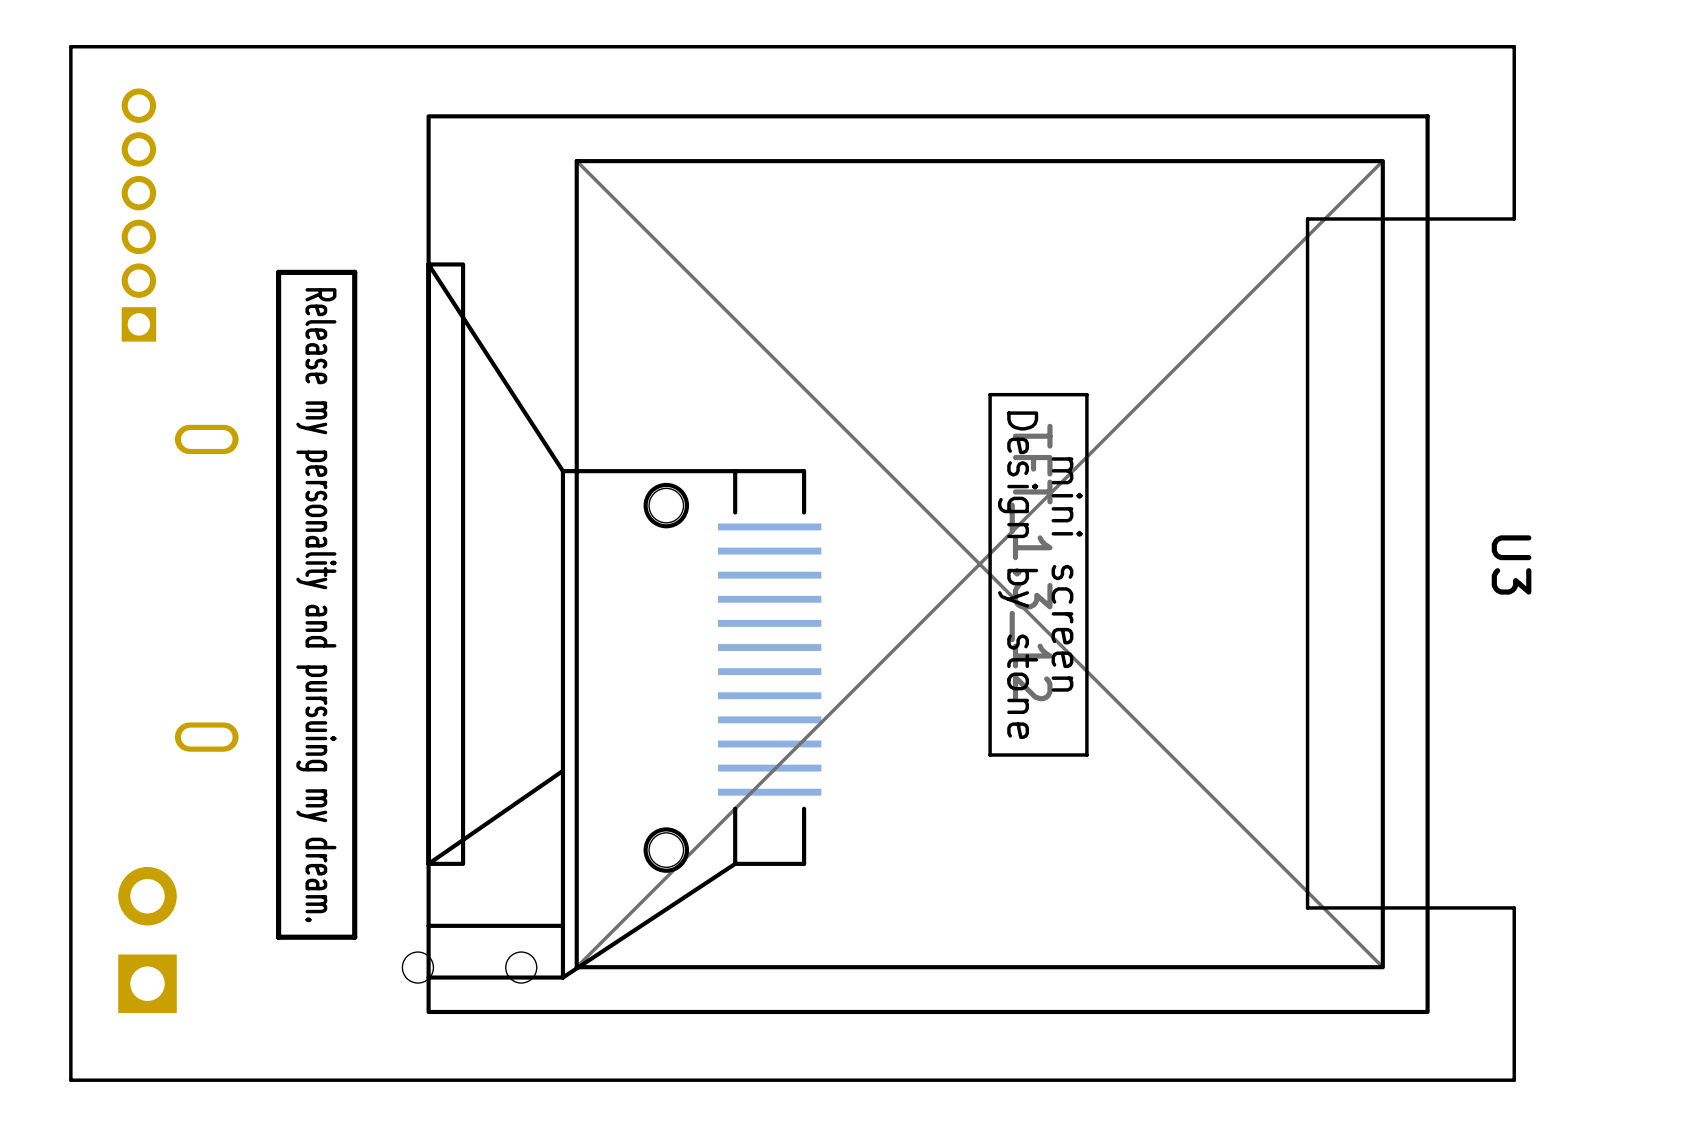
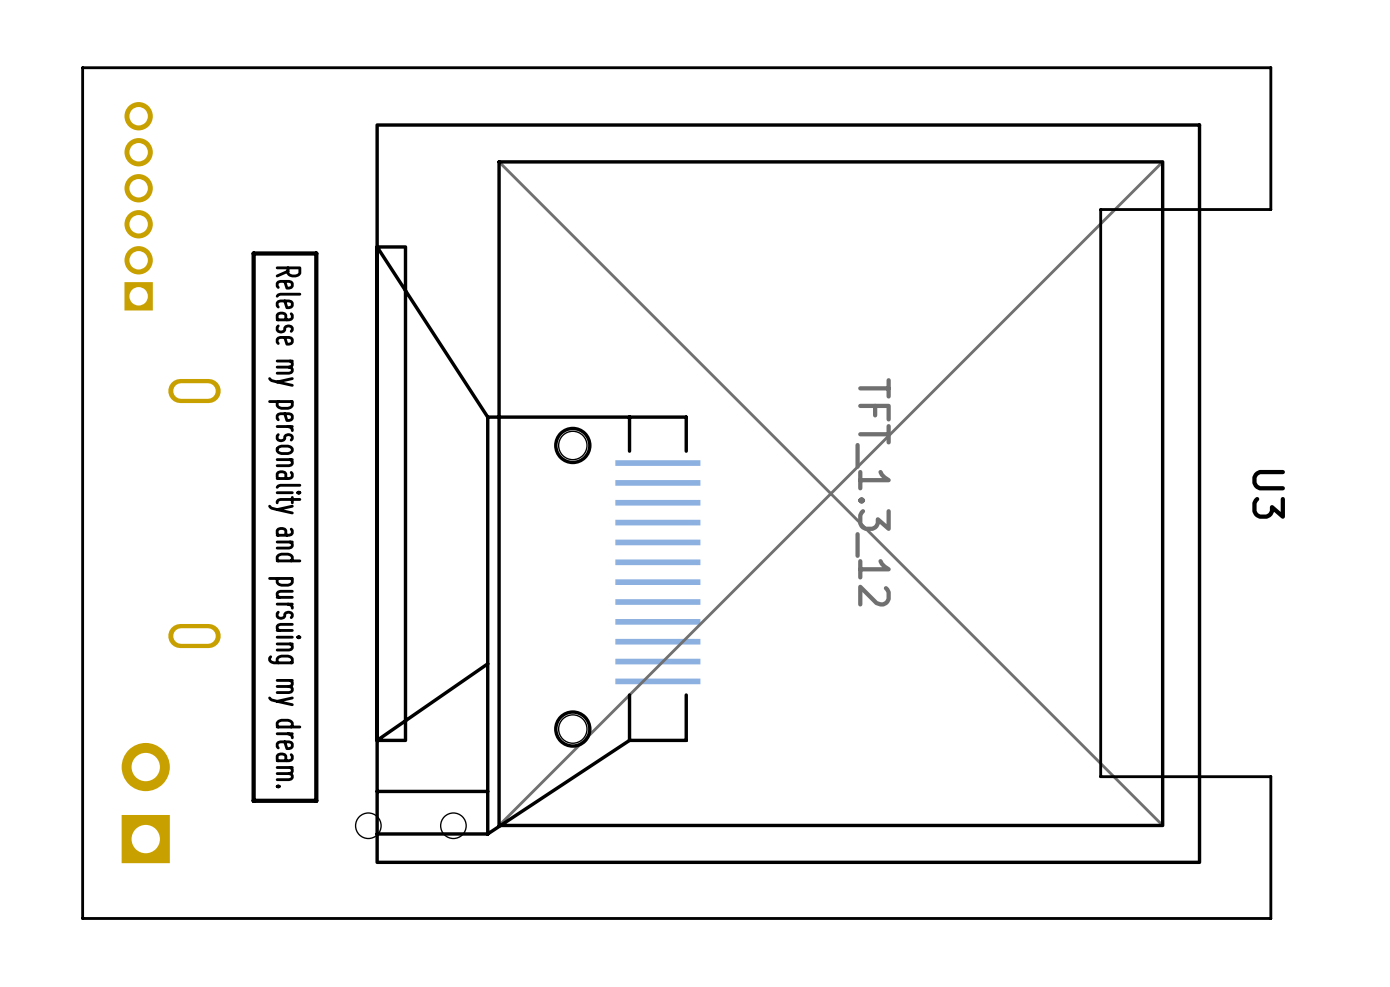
line: (1086, 394) (1086, 755) (990, 755) (990, 394) (1086, 394) -> none
text: mini screen (1067, 574) -> none
text: Design by stone (1018, 575) -> none

